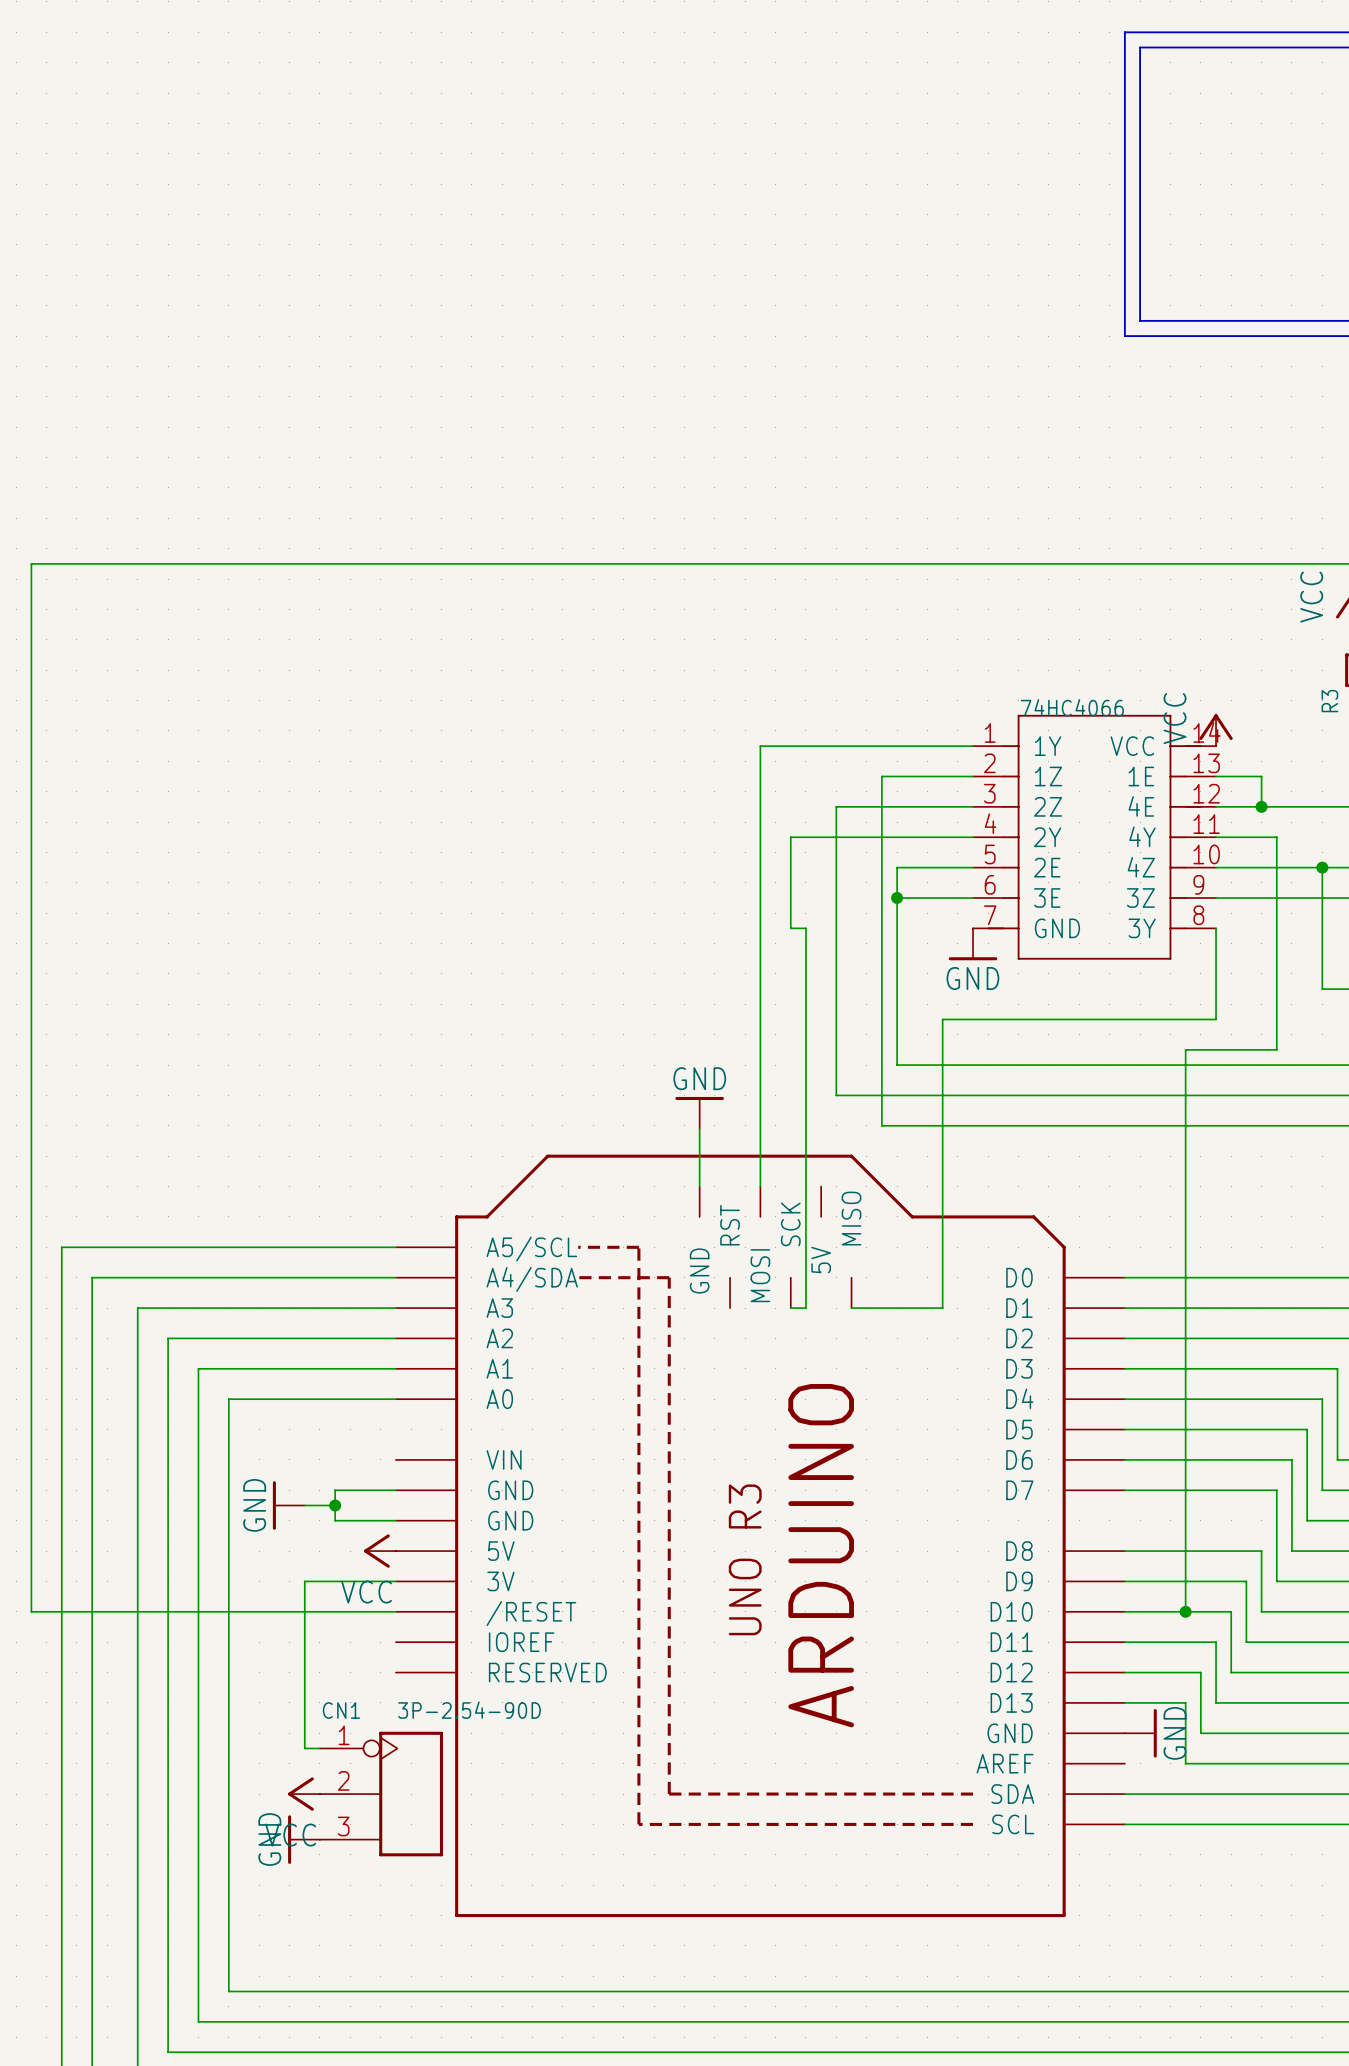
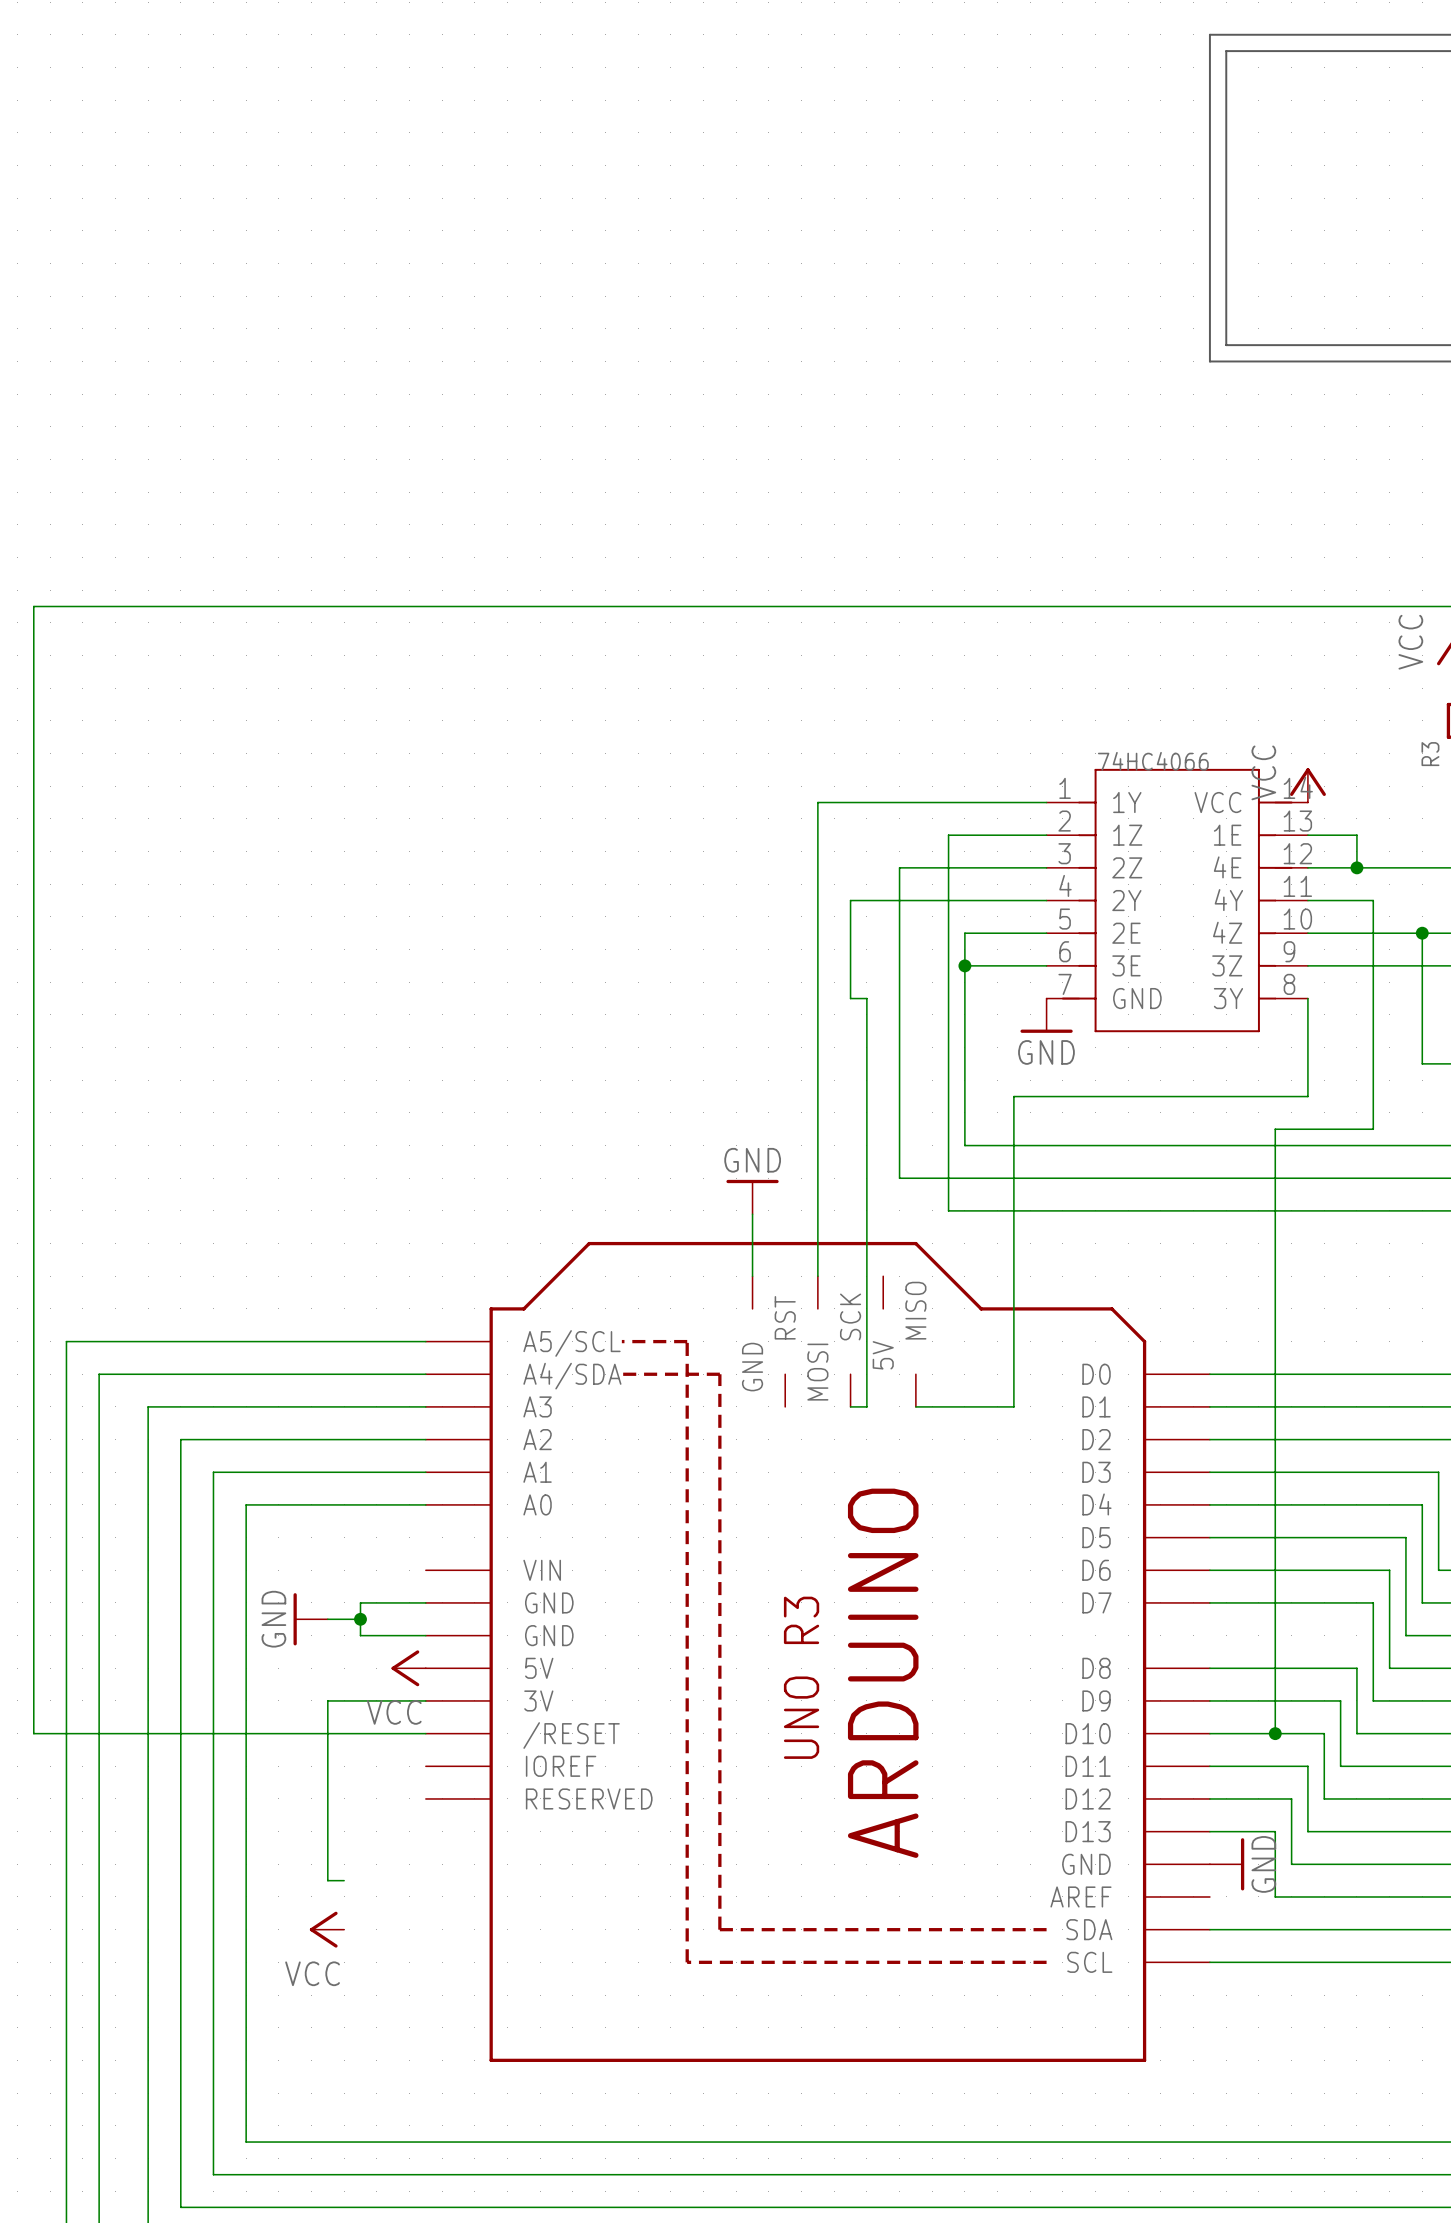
CN1: 3P-2.54-90D (381, 1794) -> none
power symbol: GND (304, 1839) -> none

